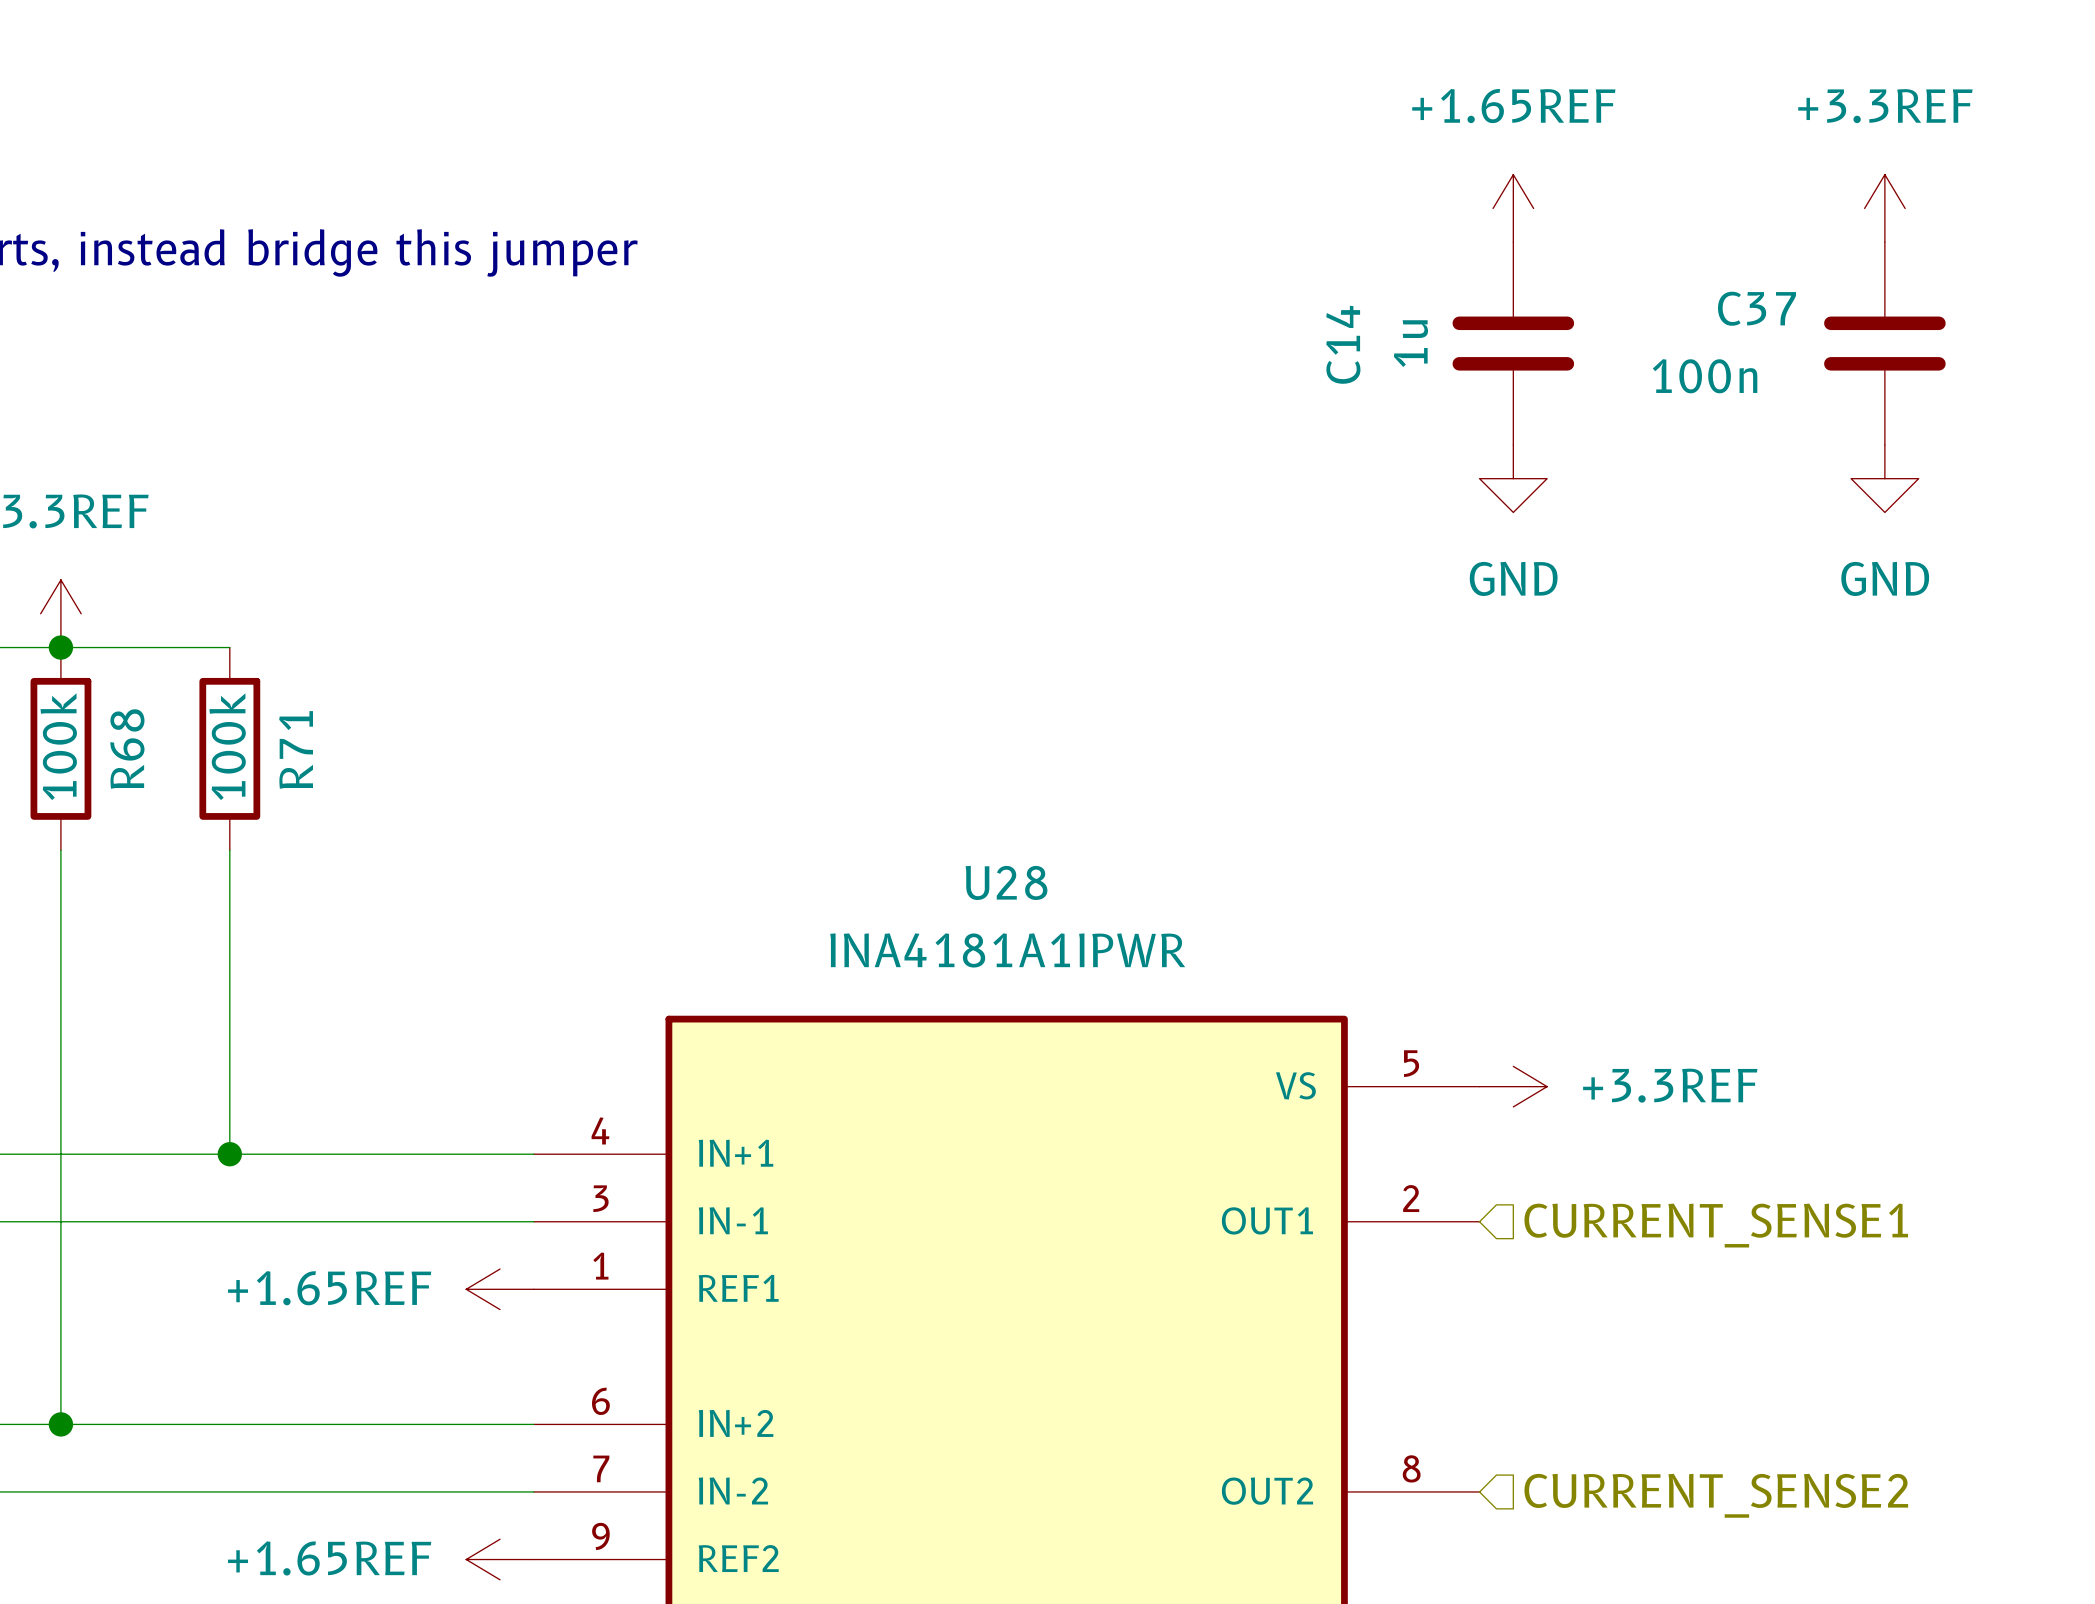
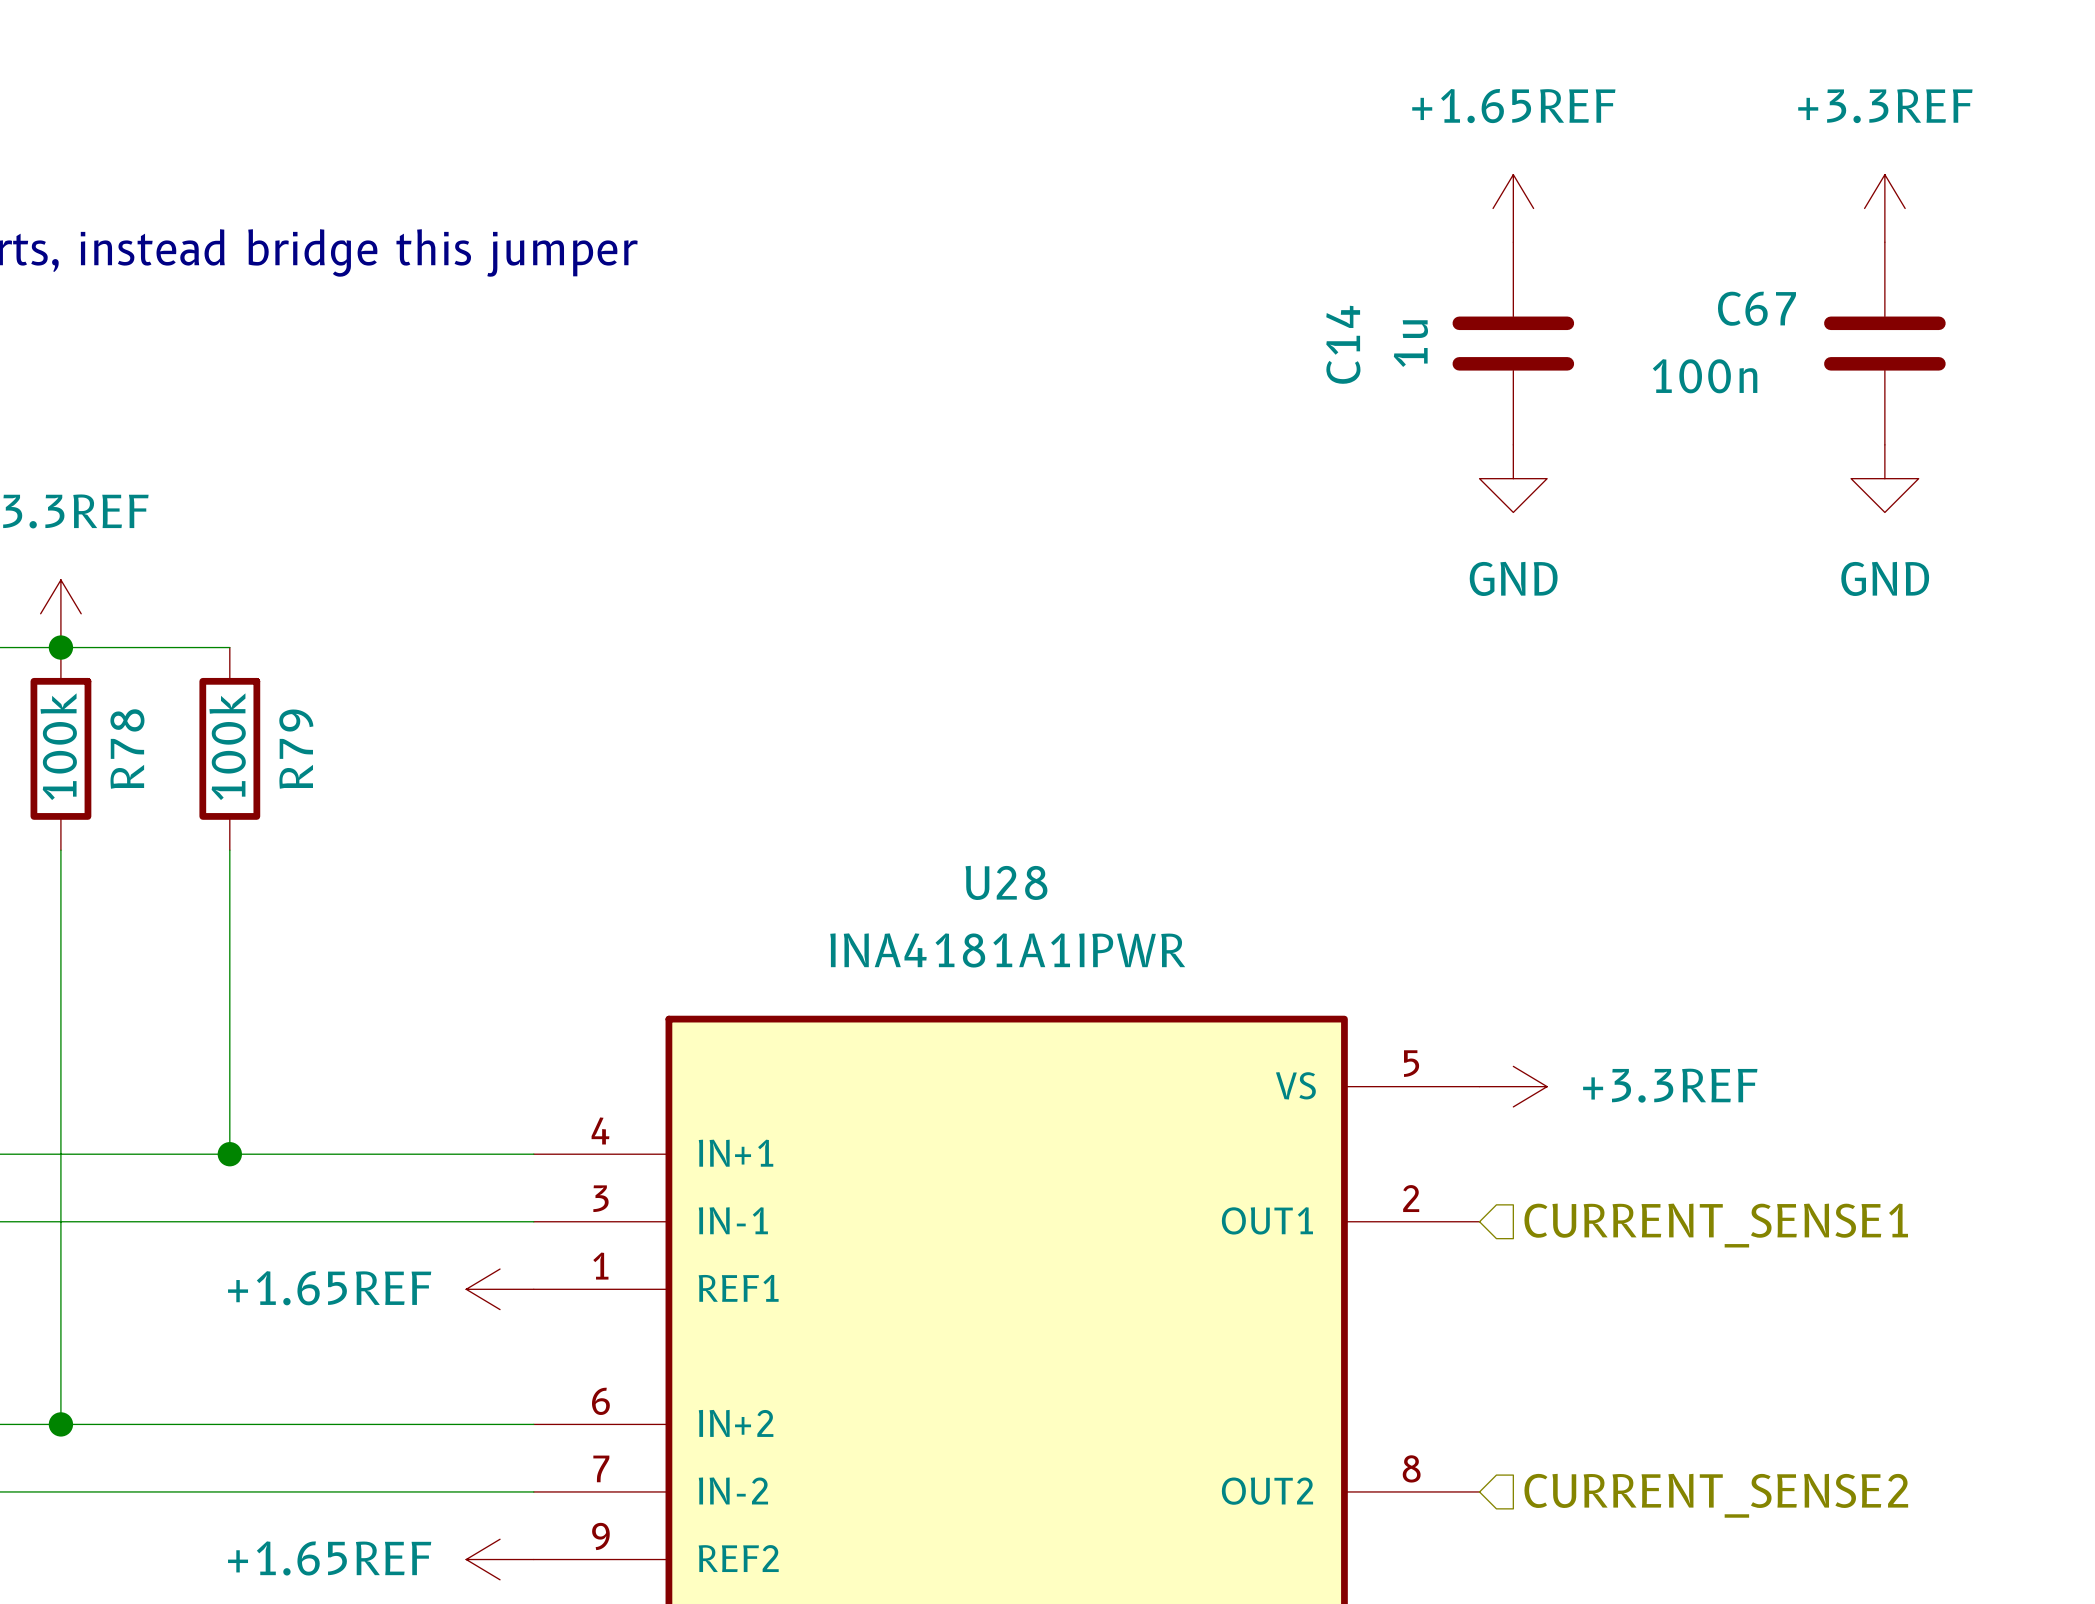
C37 name: C37 (1756, 308) -> C67 (1756, 308)
R68 name: R68 (127, 749) -> R78 (127, 749)
R71 name: R71 (296, 749) -> R79 (296, 749)

